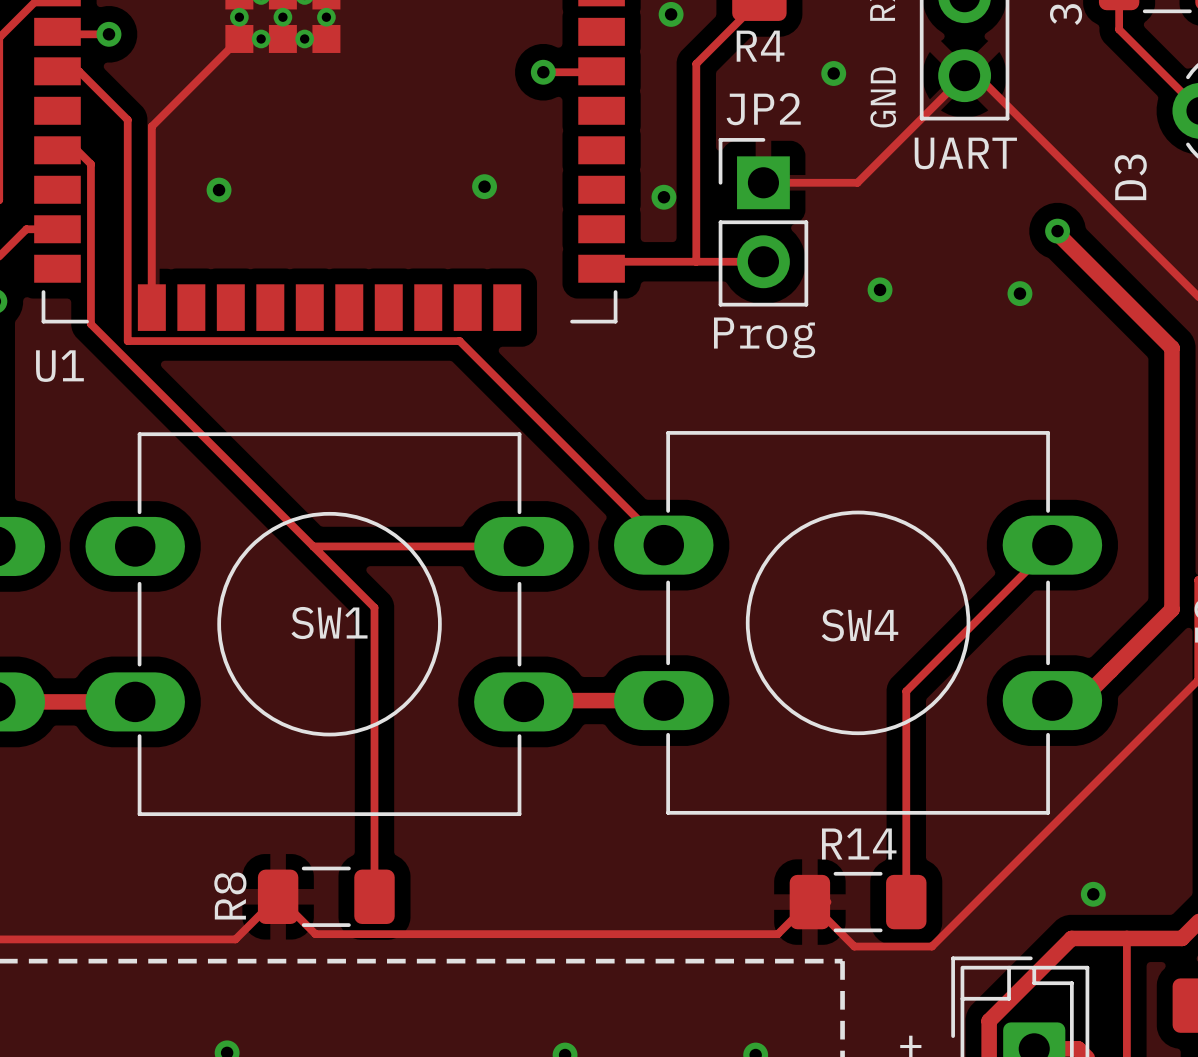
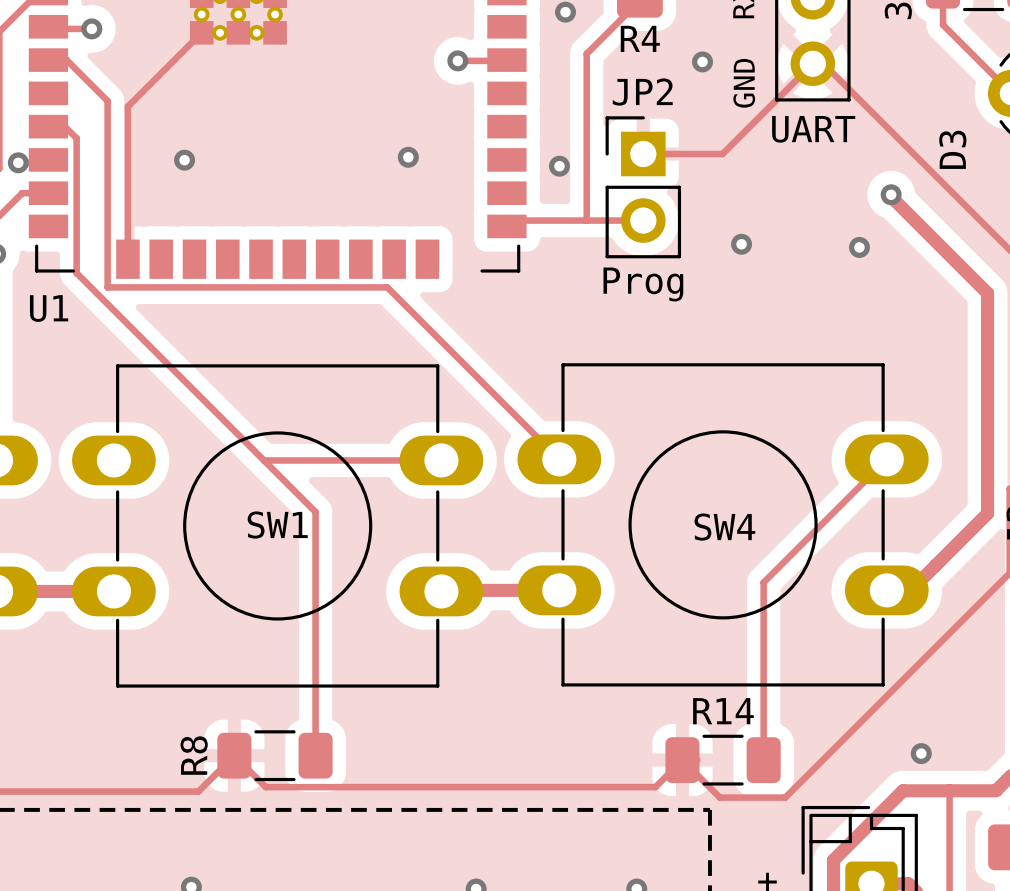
via: none -> (18, 162)

